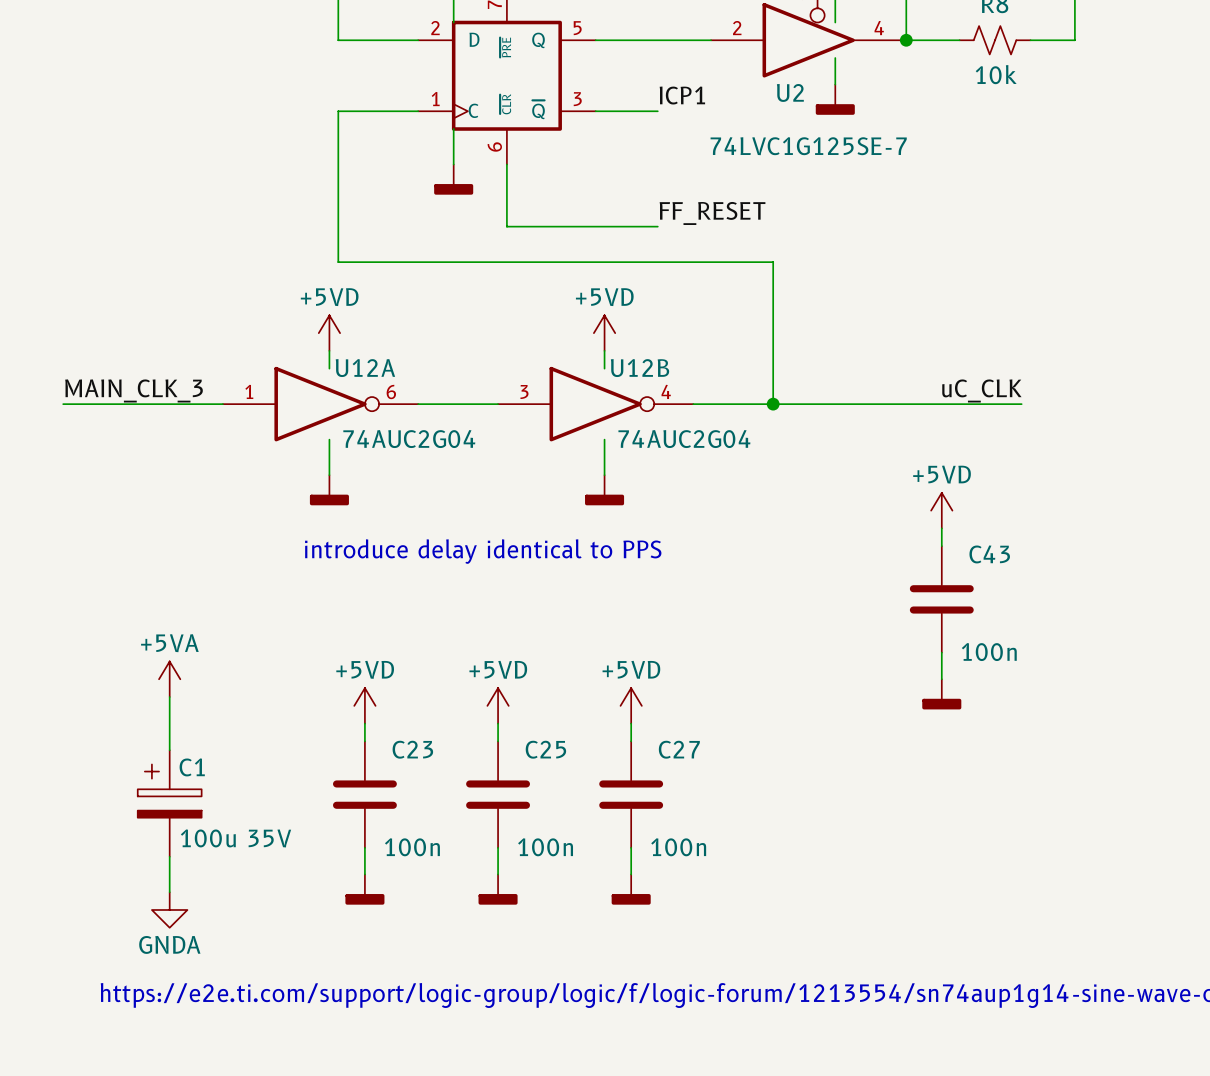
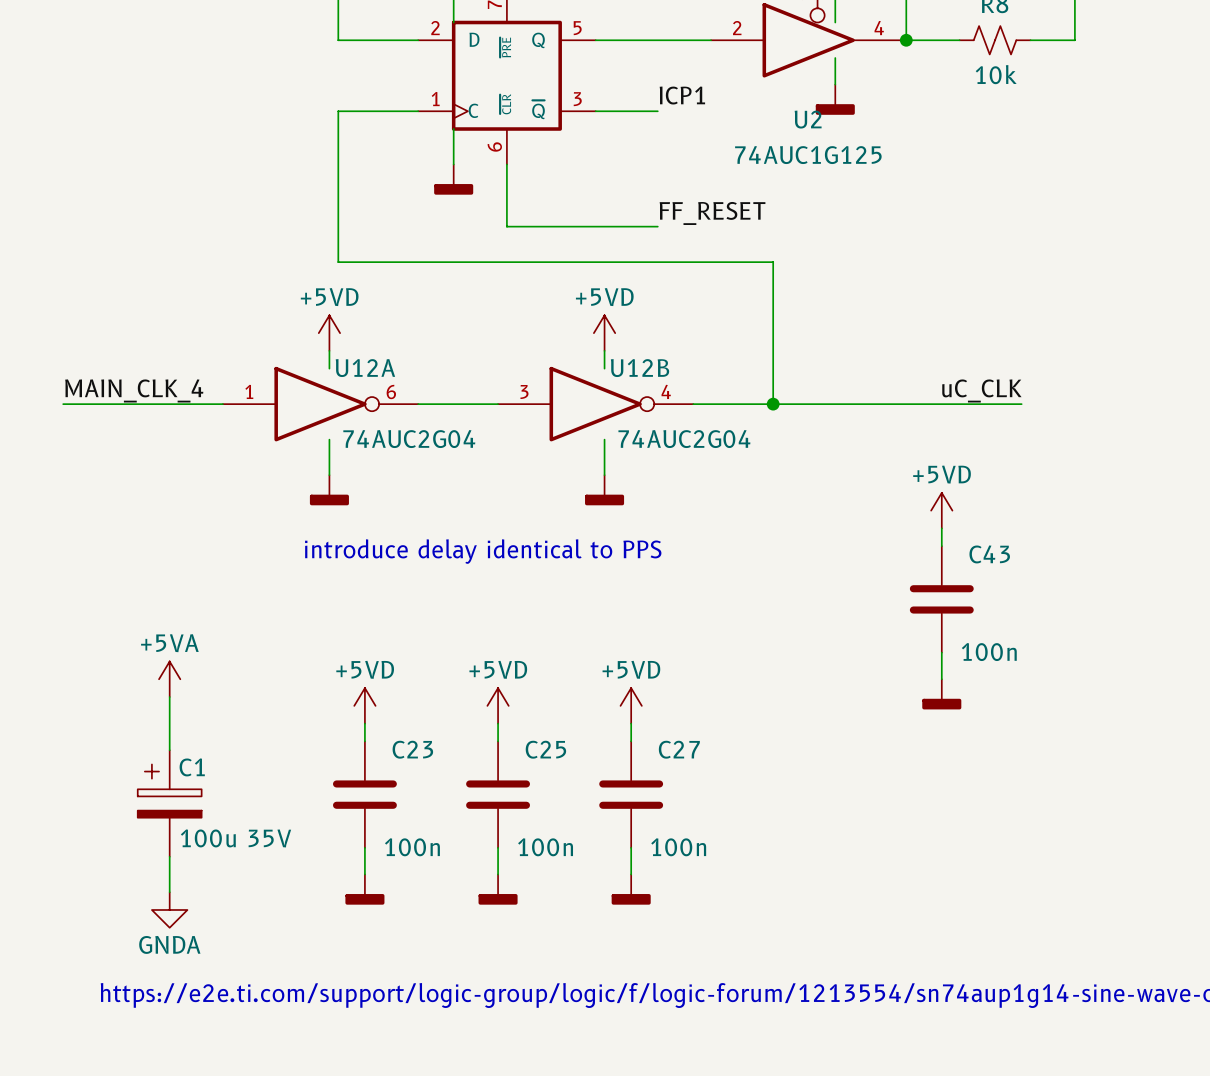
U2 name position: U2 (790, 92) -> U2 (808, 119)
U2 value: 74LVC1G125SE-7 (808, 146) -> 74AUC1G125 (808, 155)
label: MAIN_CLK_3 (134, 390) -> MAIN_CLK_4 (134, 390)

